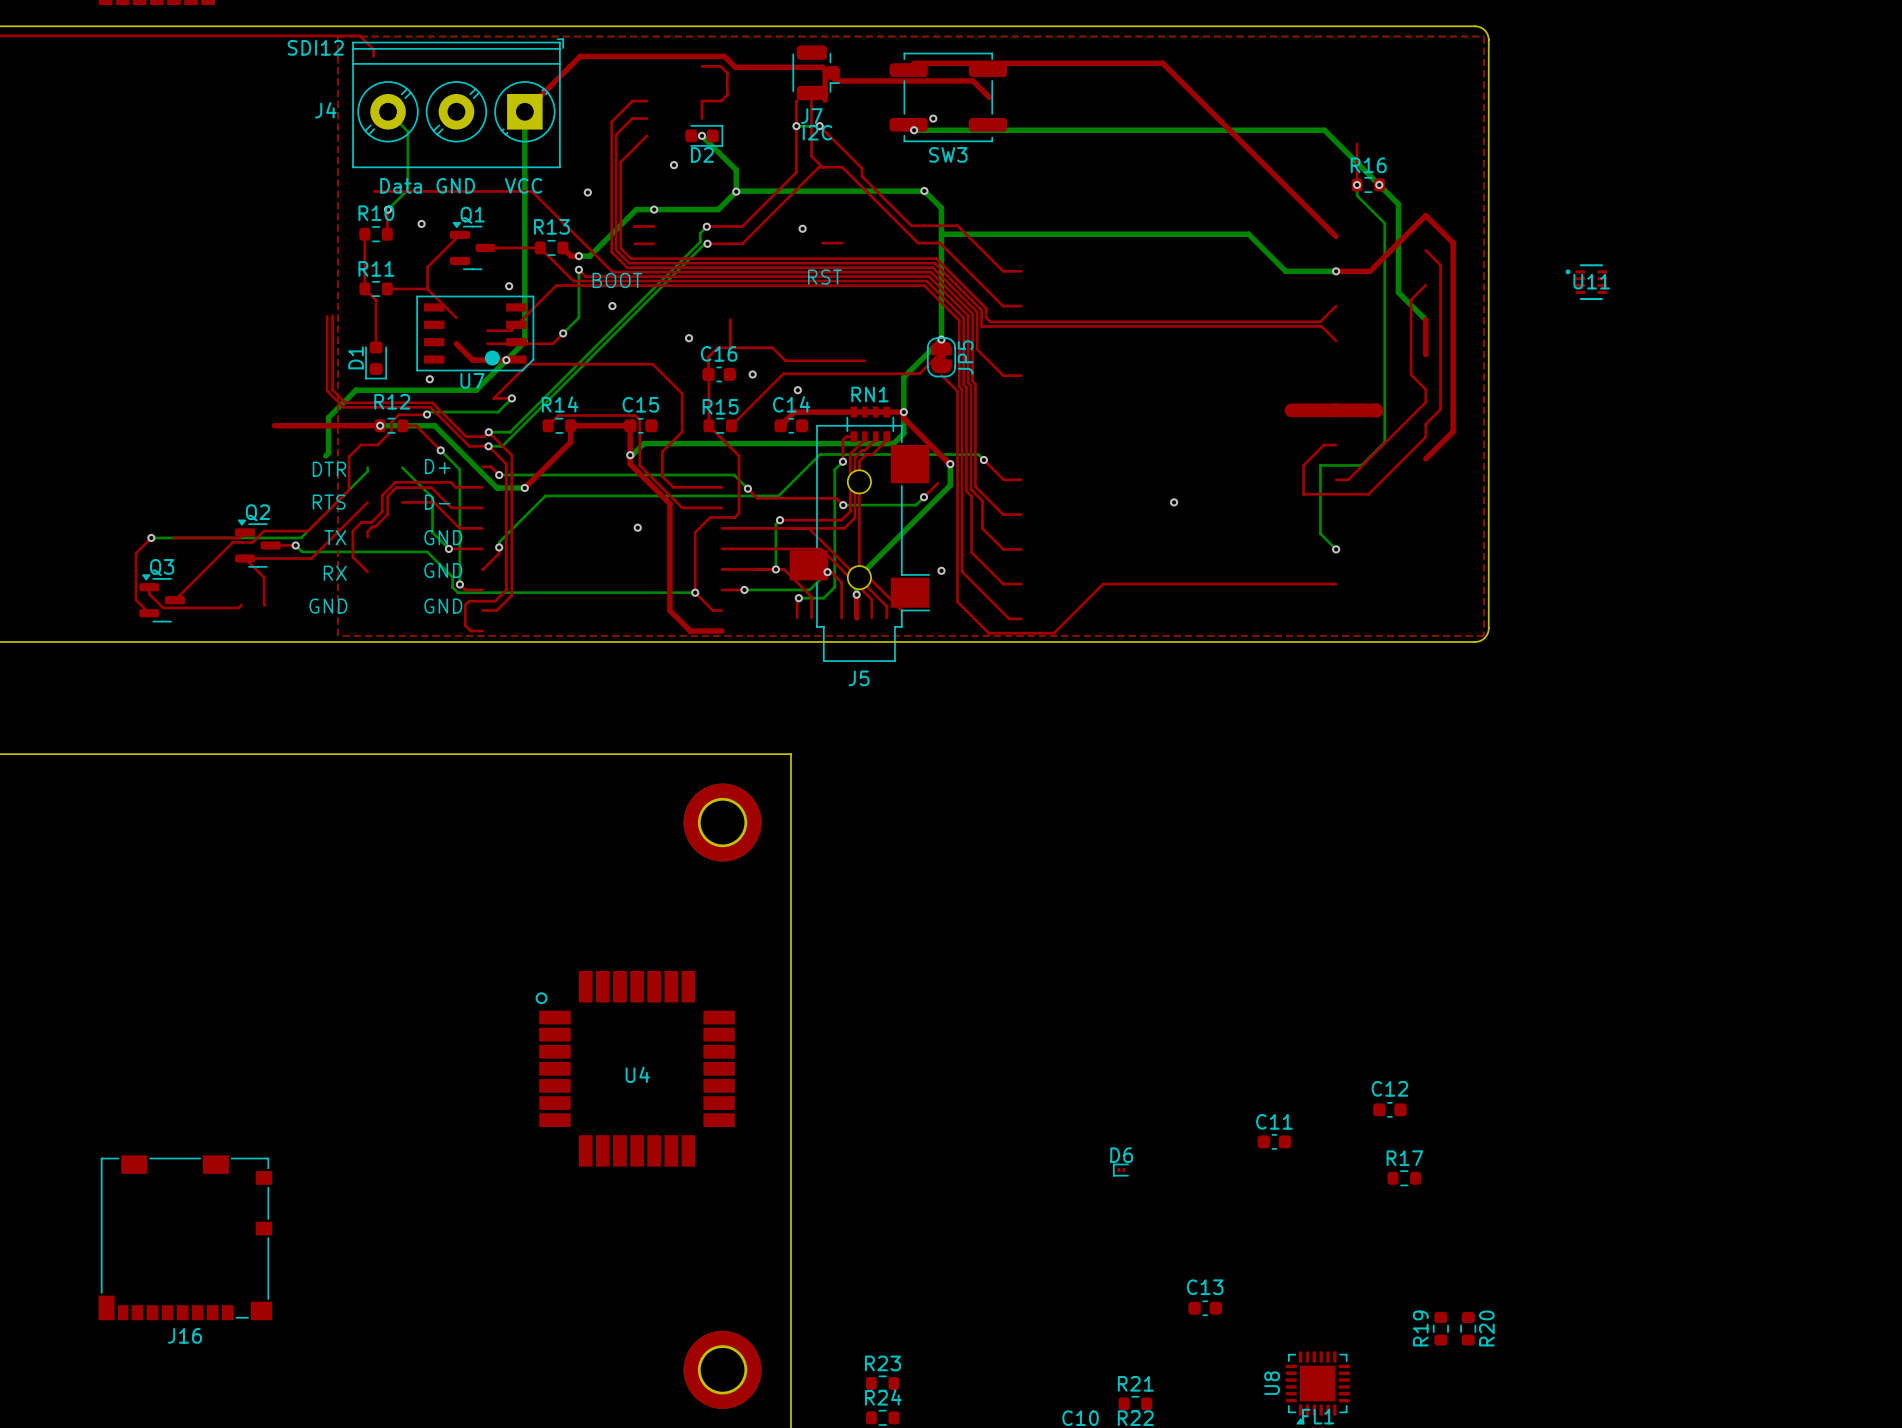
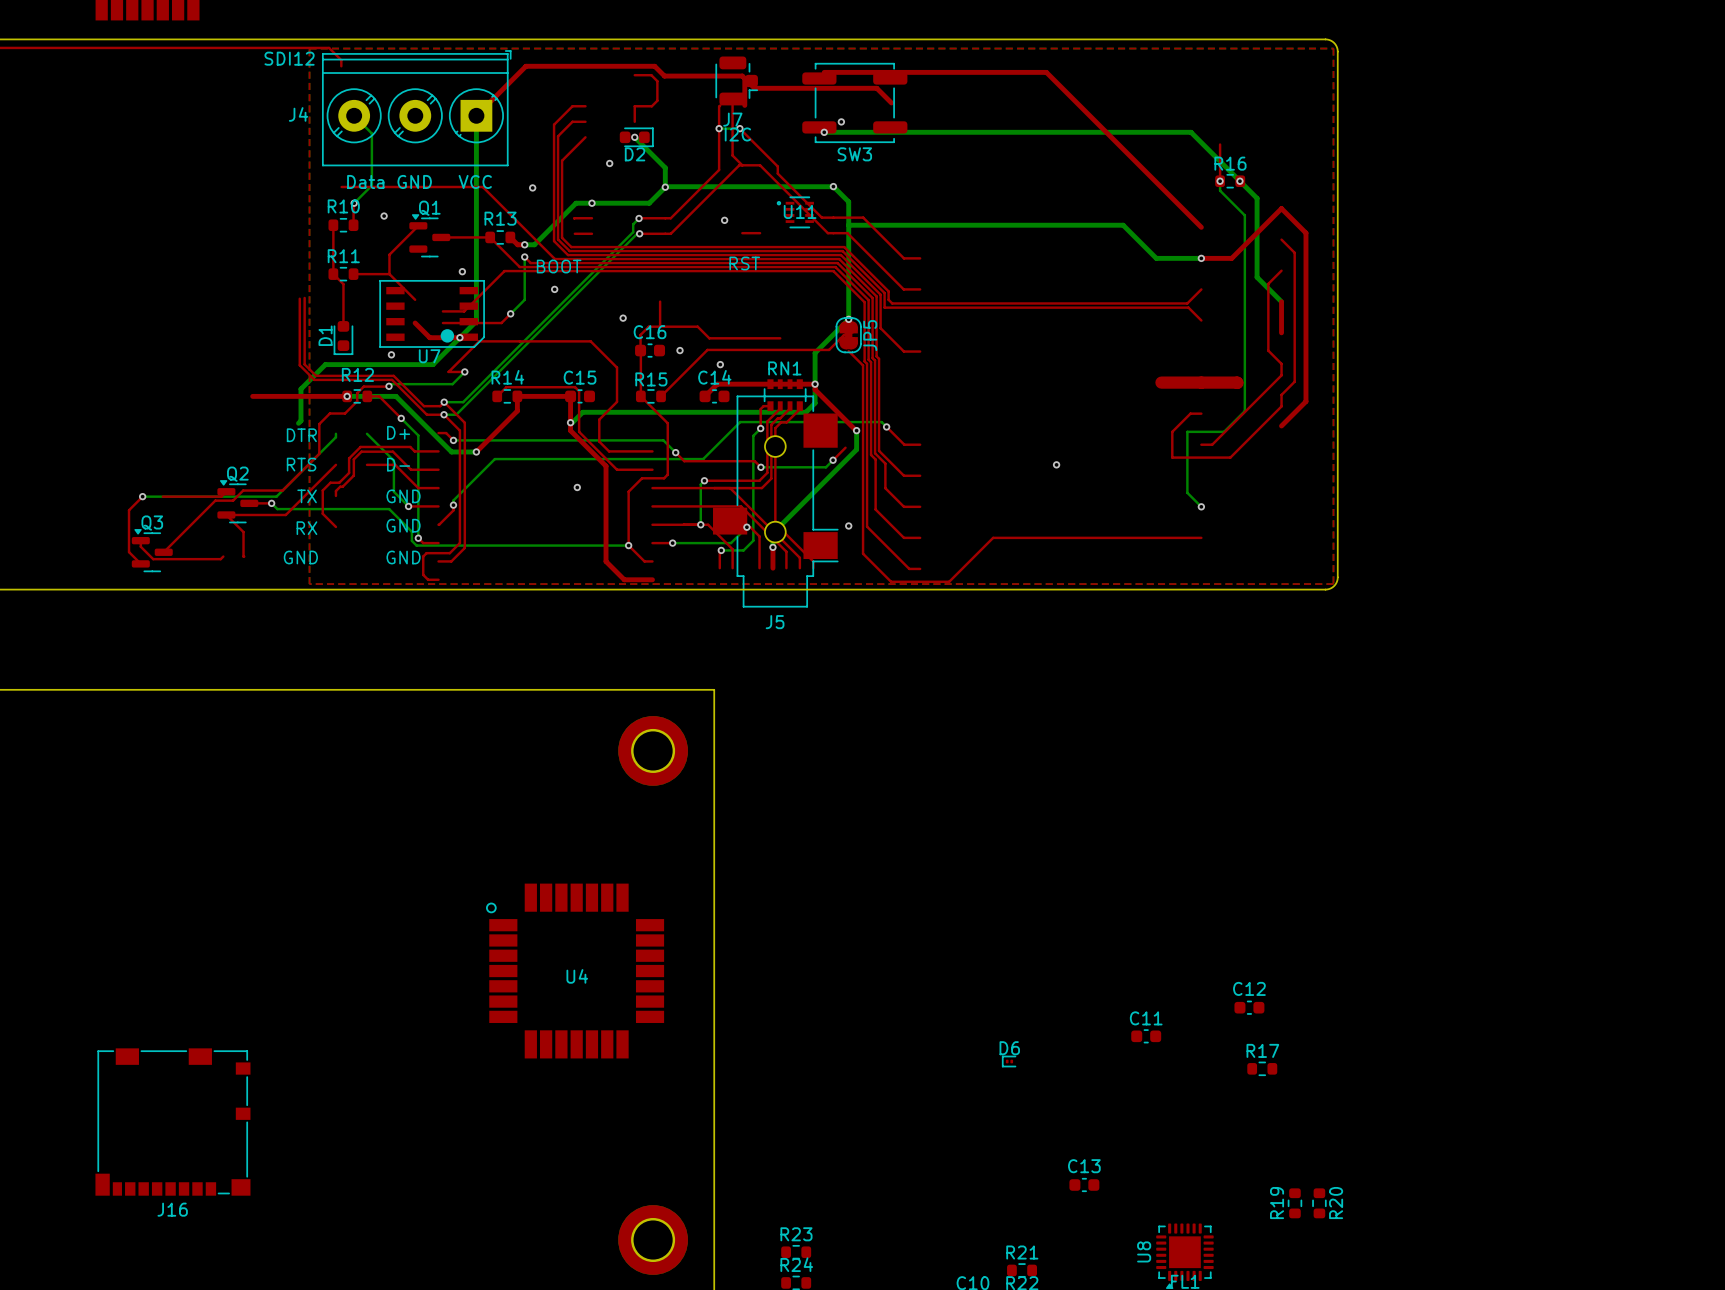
U11 position: (1586, 282) -> (795, 212)

